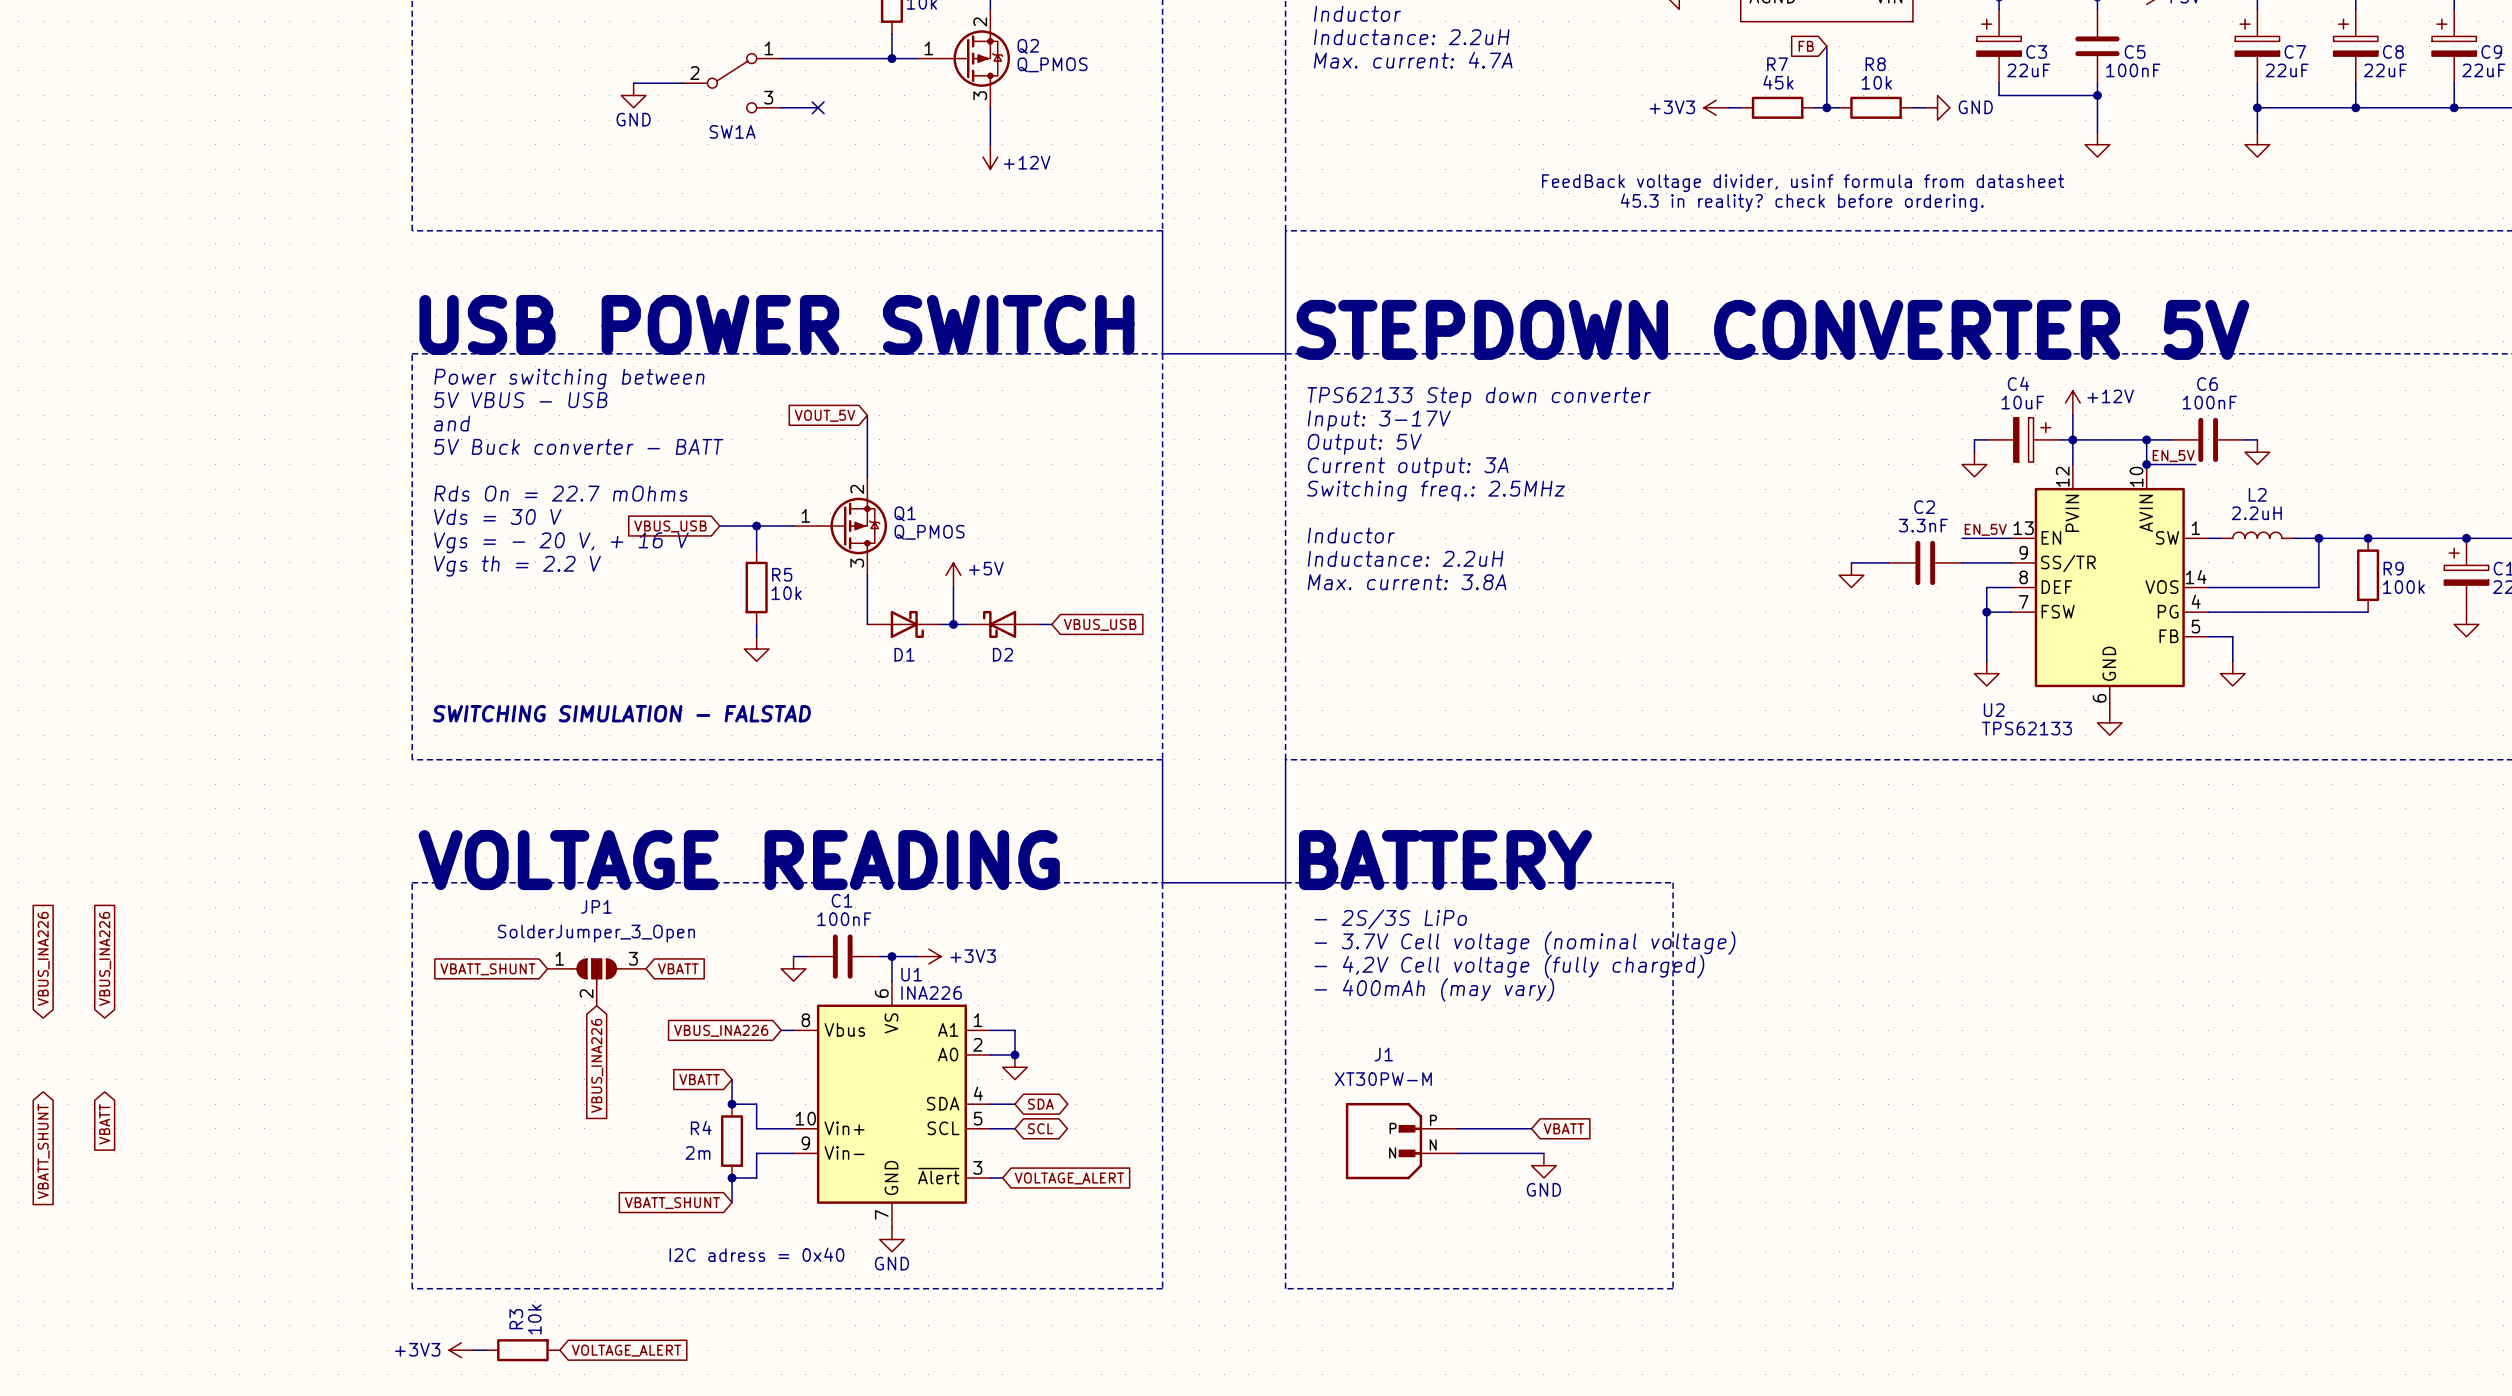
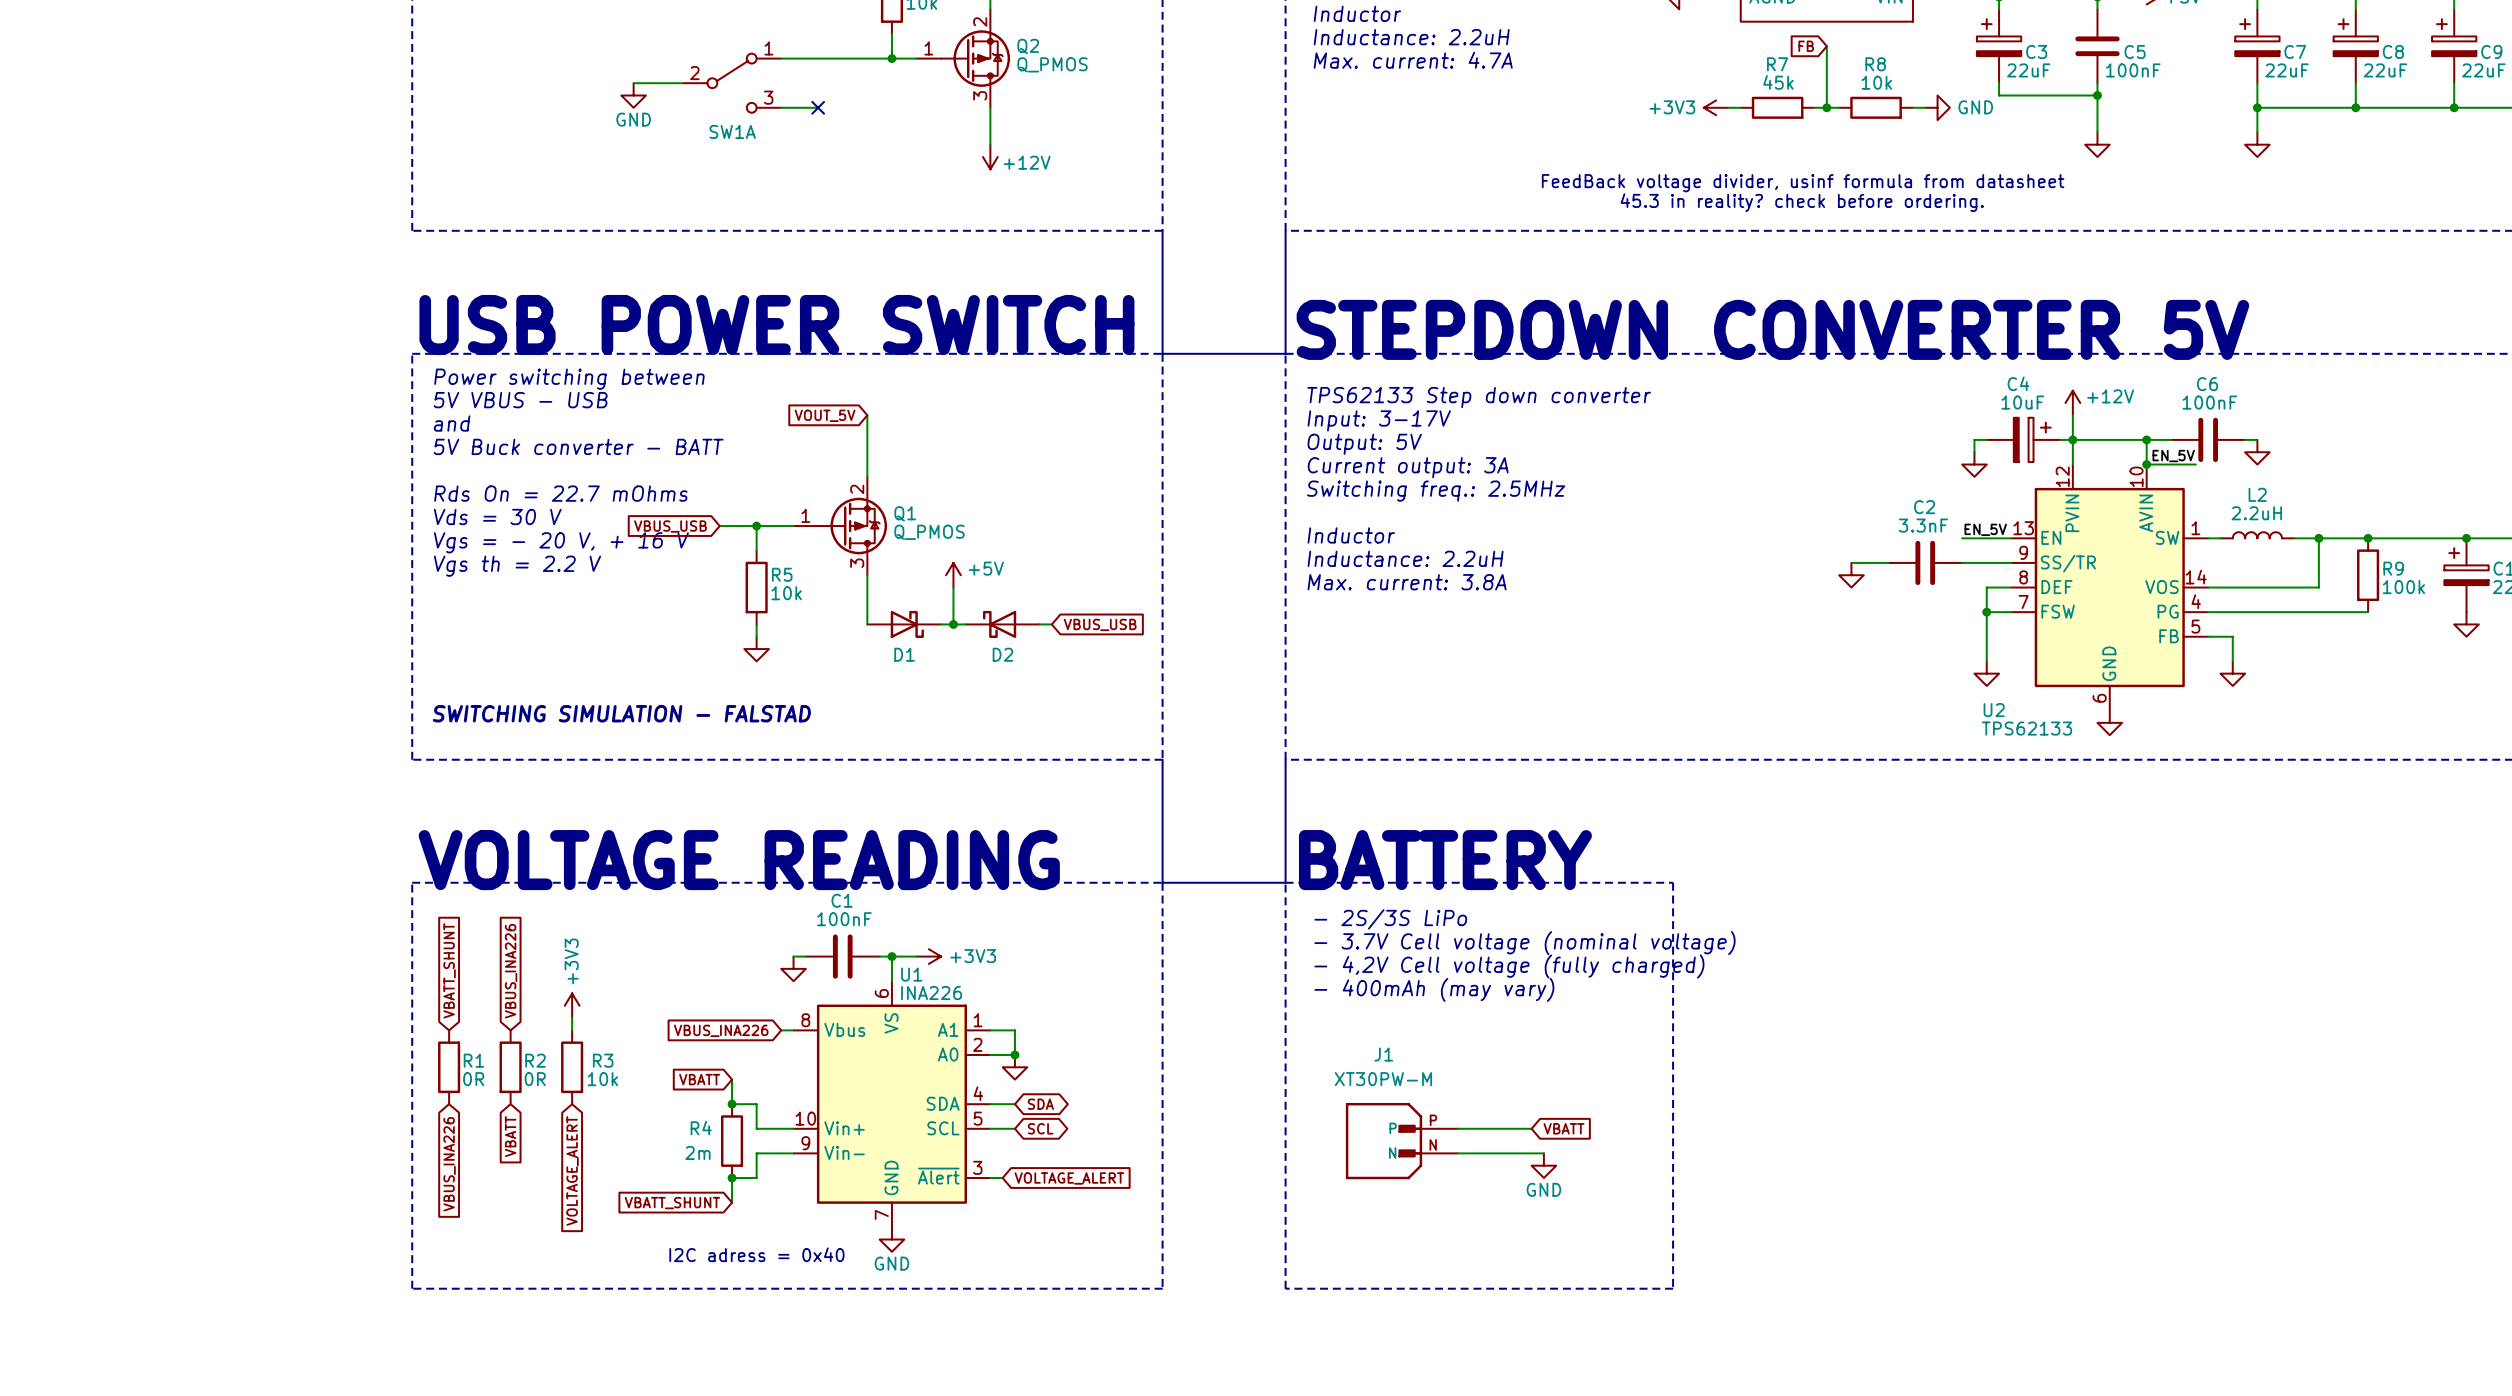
global label: VBUS_INA226 (43, 958) -> none
global label: VBUS_INA226 (105, 958) -> none
global label rotation: 0° (678, 968) -> 90° clockwise (510, 1136)
global label position: VBATT (678, 968) -> VBATT (510, 1136)
global label rotation: 0° (487, 969) -> 90° clockwise (449, 970)
global label: none -> VBUS_INA226 (511, 971)
JP1: SolderJumper_3_Open (596, 982) -> none
power symbol: none -> +3V3 (572, 1005)
wire: none -> (572, 1018) (572, 1030)
global label: VBUS_INA226 (597, 1065) -> none
R1: none -> 0R (449, 1067)
R2: none -> 0R (510, 1067)
global label: VBATT (104, 1124) -> none
global label: VBATT_SHUNT (43, 1151) -> none
global label: none -> VBUS_INA226 (449, 1164)
global label: none -> VOLTAGE_ALERT (572, 1170)
power symbol: +3V3 (461, 1350) -> none
wire: (473, 1350) (486, 1350) -> none
R3 rotation: 0° (522, 1350) -> 90° clockwise (572, 1067)
R3 position: (522, 1350) -> (572, 1067)
global label: VOLTAGE_ALERT (626, 1350) -> none

